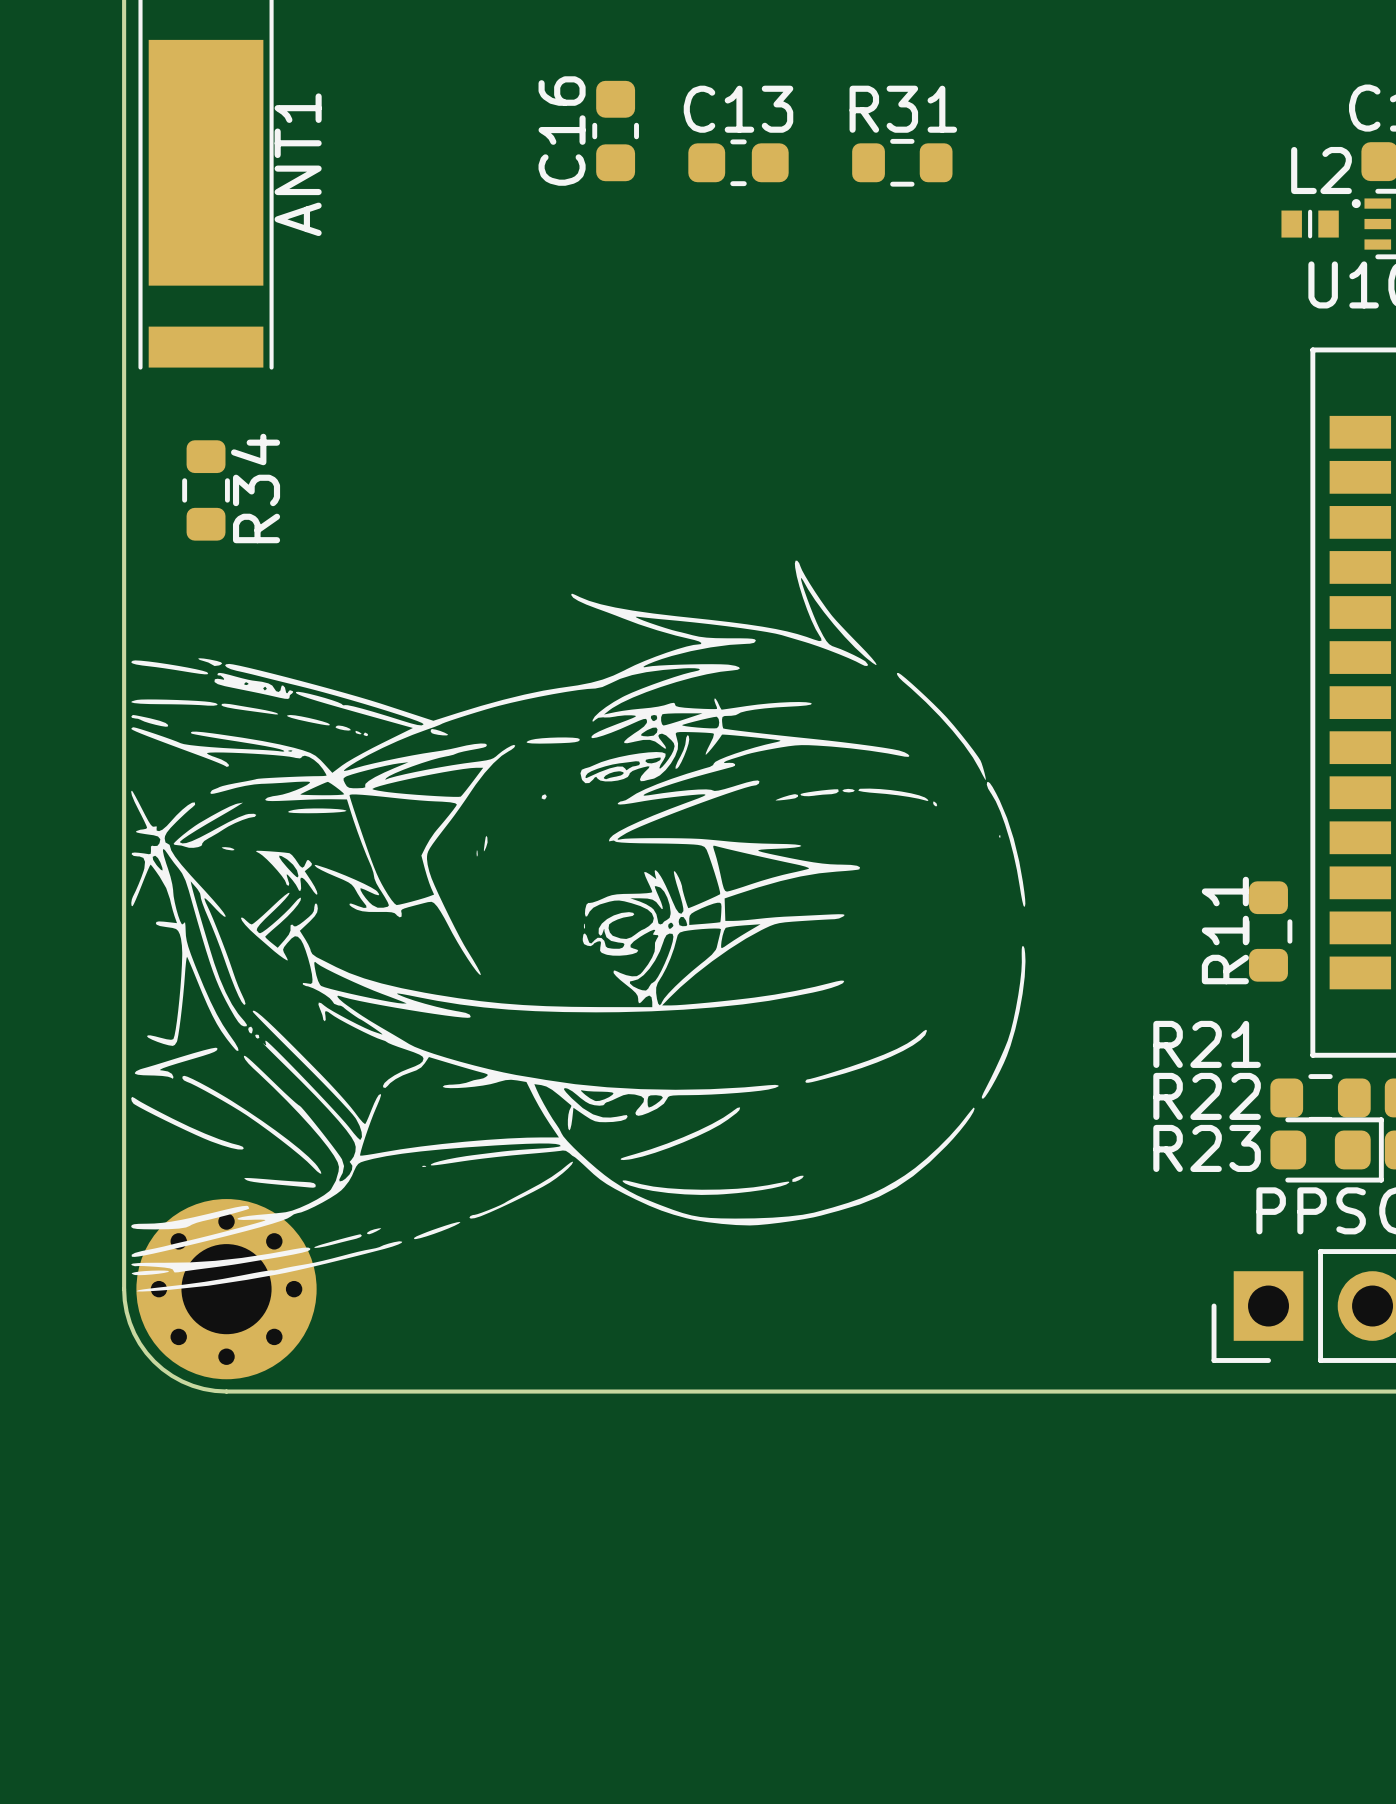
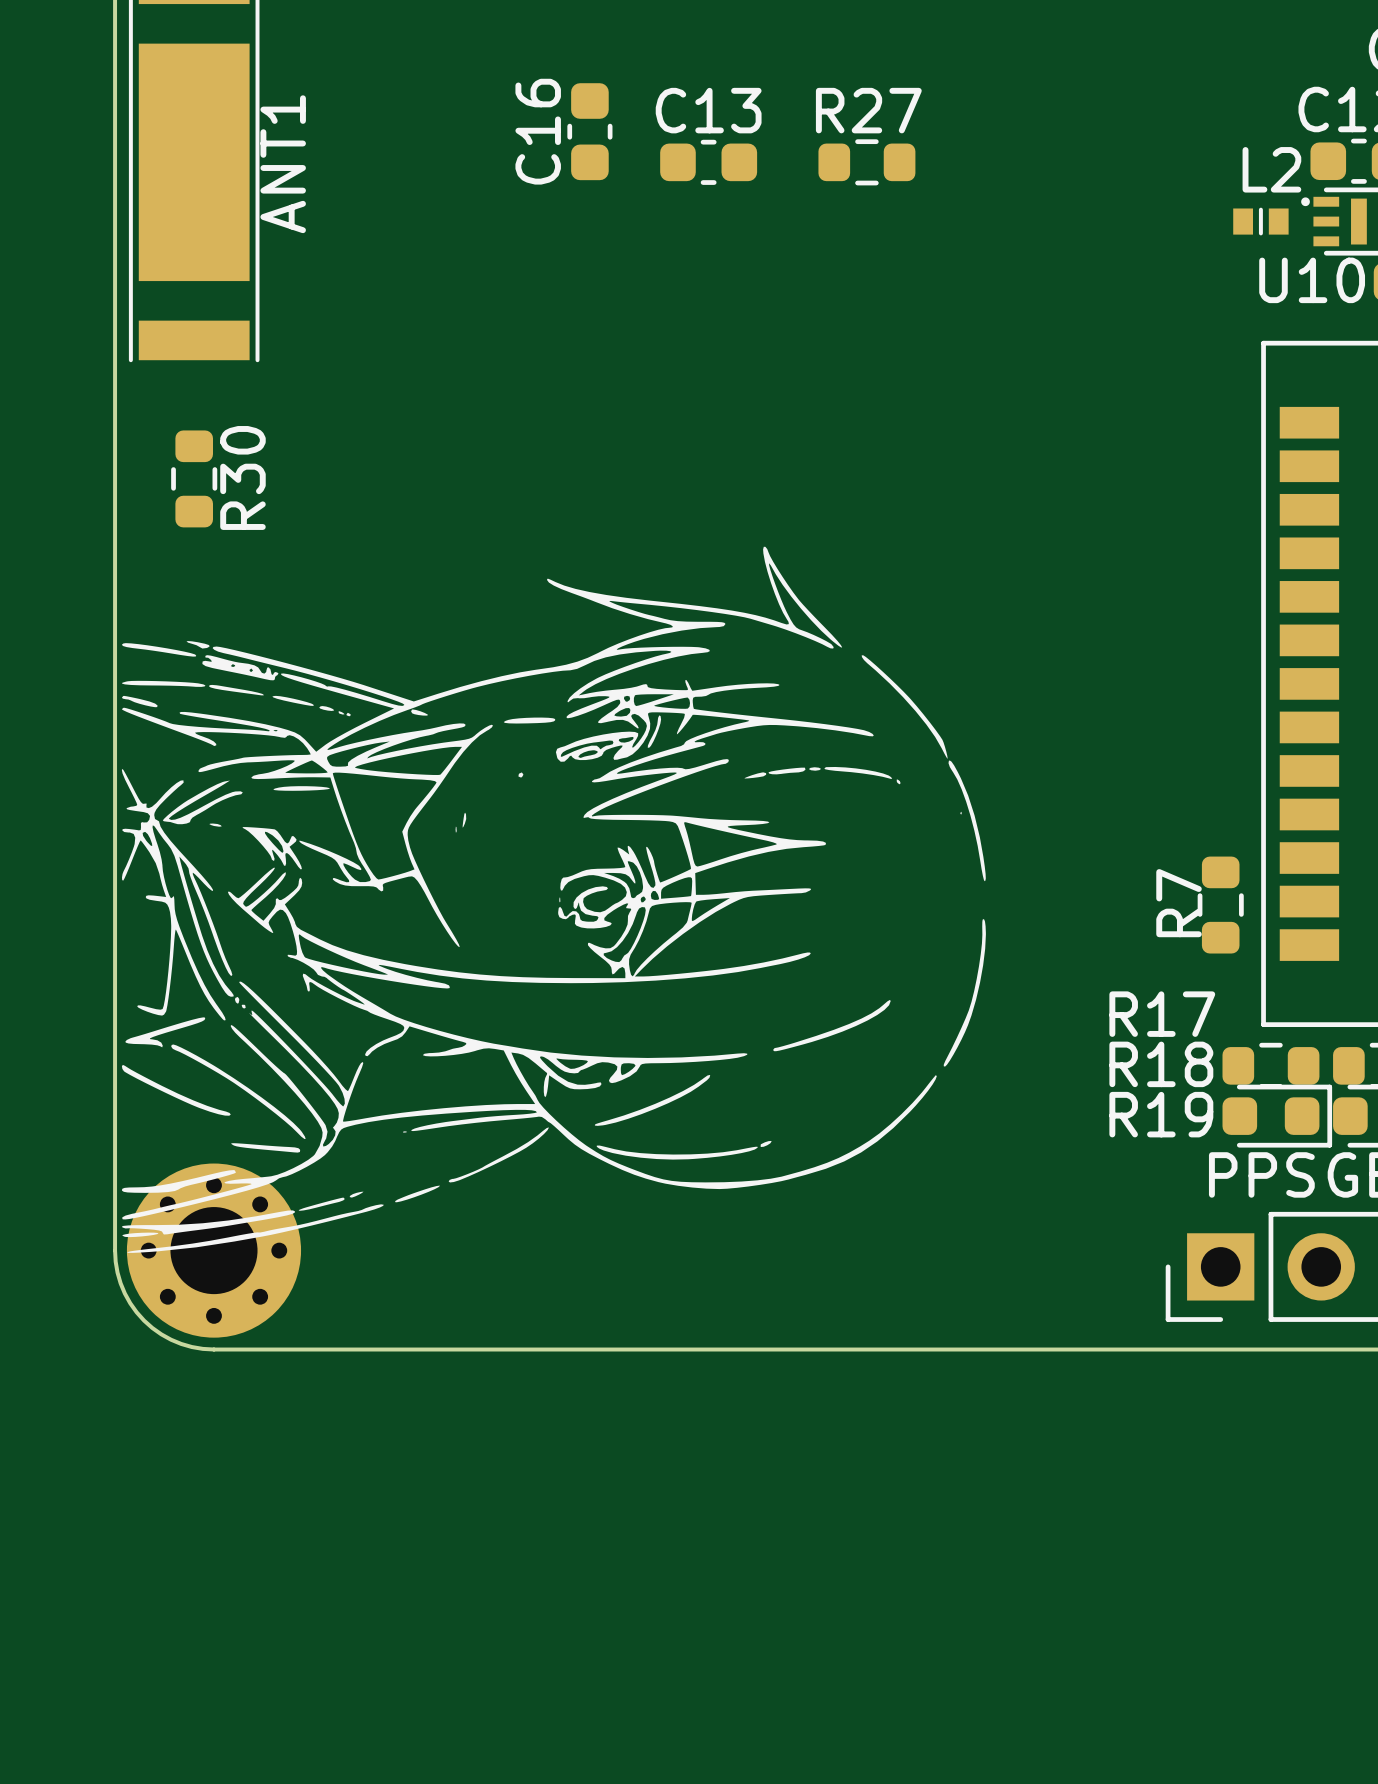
R31 name: R31 (903, 109) -> R27 (868, 110)
R34 name: R34 (255, 488) -> R30 (242, 477)
R11 name: R11 (1225, 930) -> R7 (1179, 903)
R21 name: R21 (1207, 1044) -> R17 (1162, 1014)
R22 name: R22 (1207, 1096) -> R18 (1161, 1064)
R23 name: R23 (1207, 1148) -> R19 (1161, 1114)

